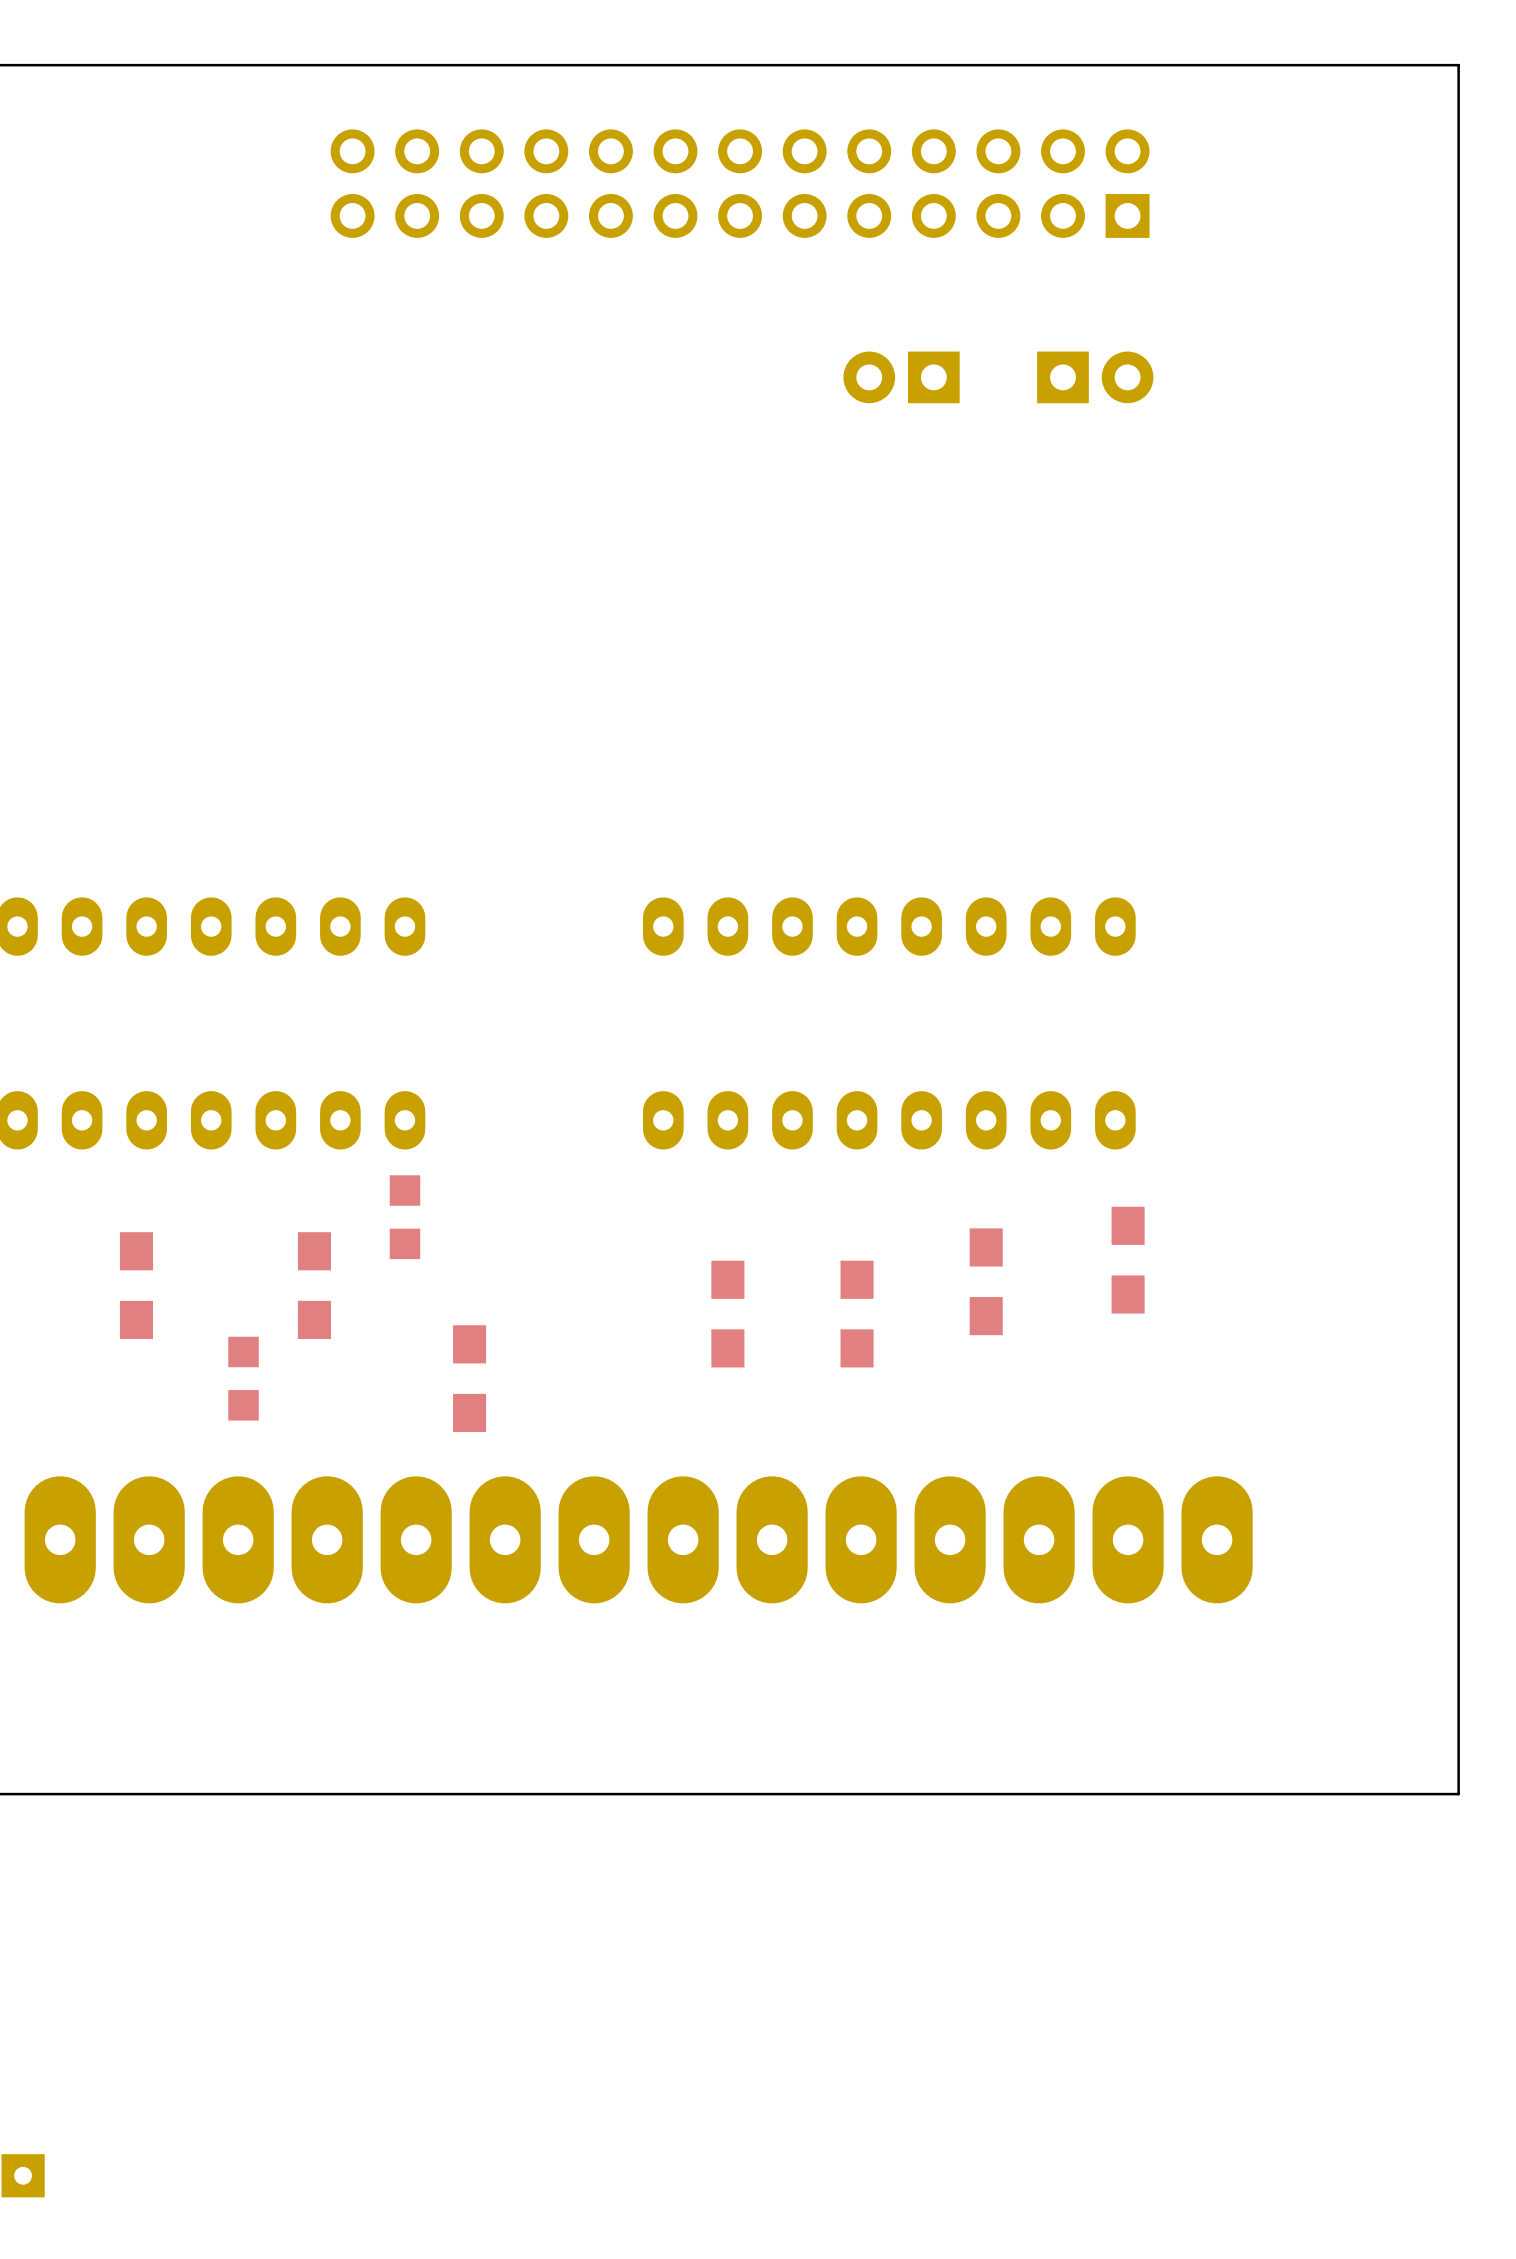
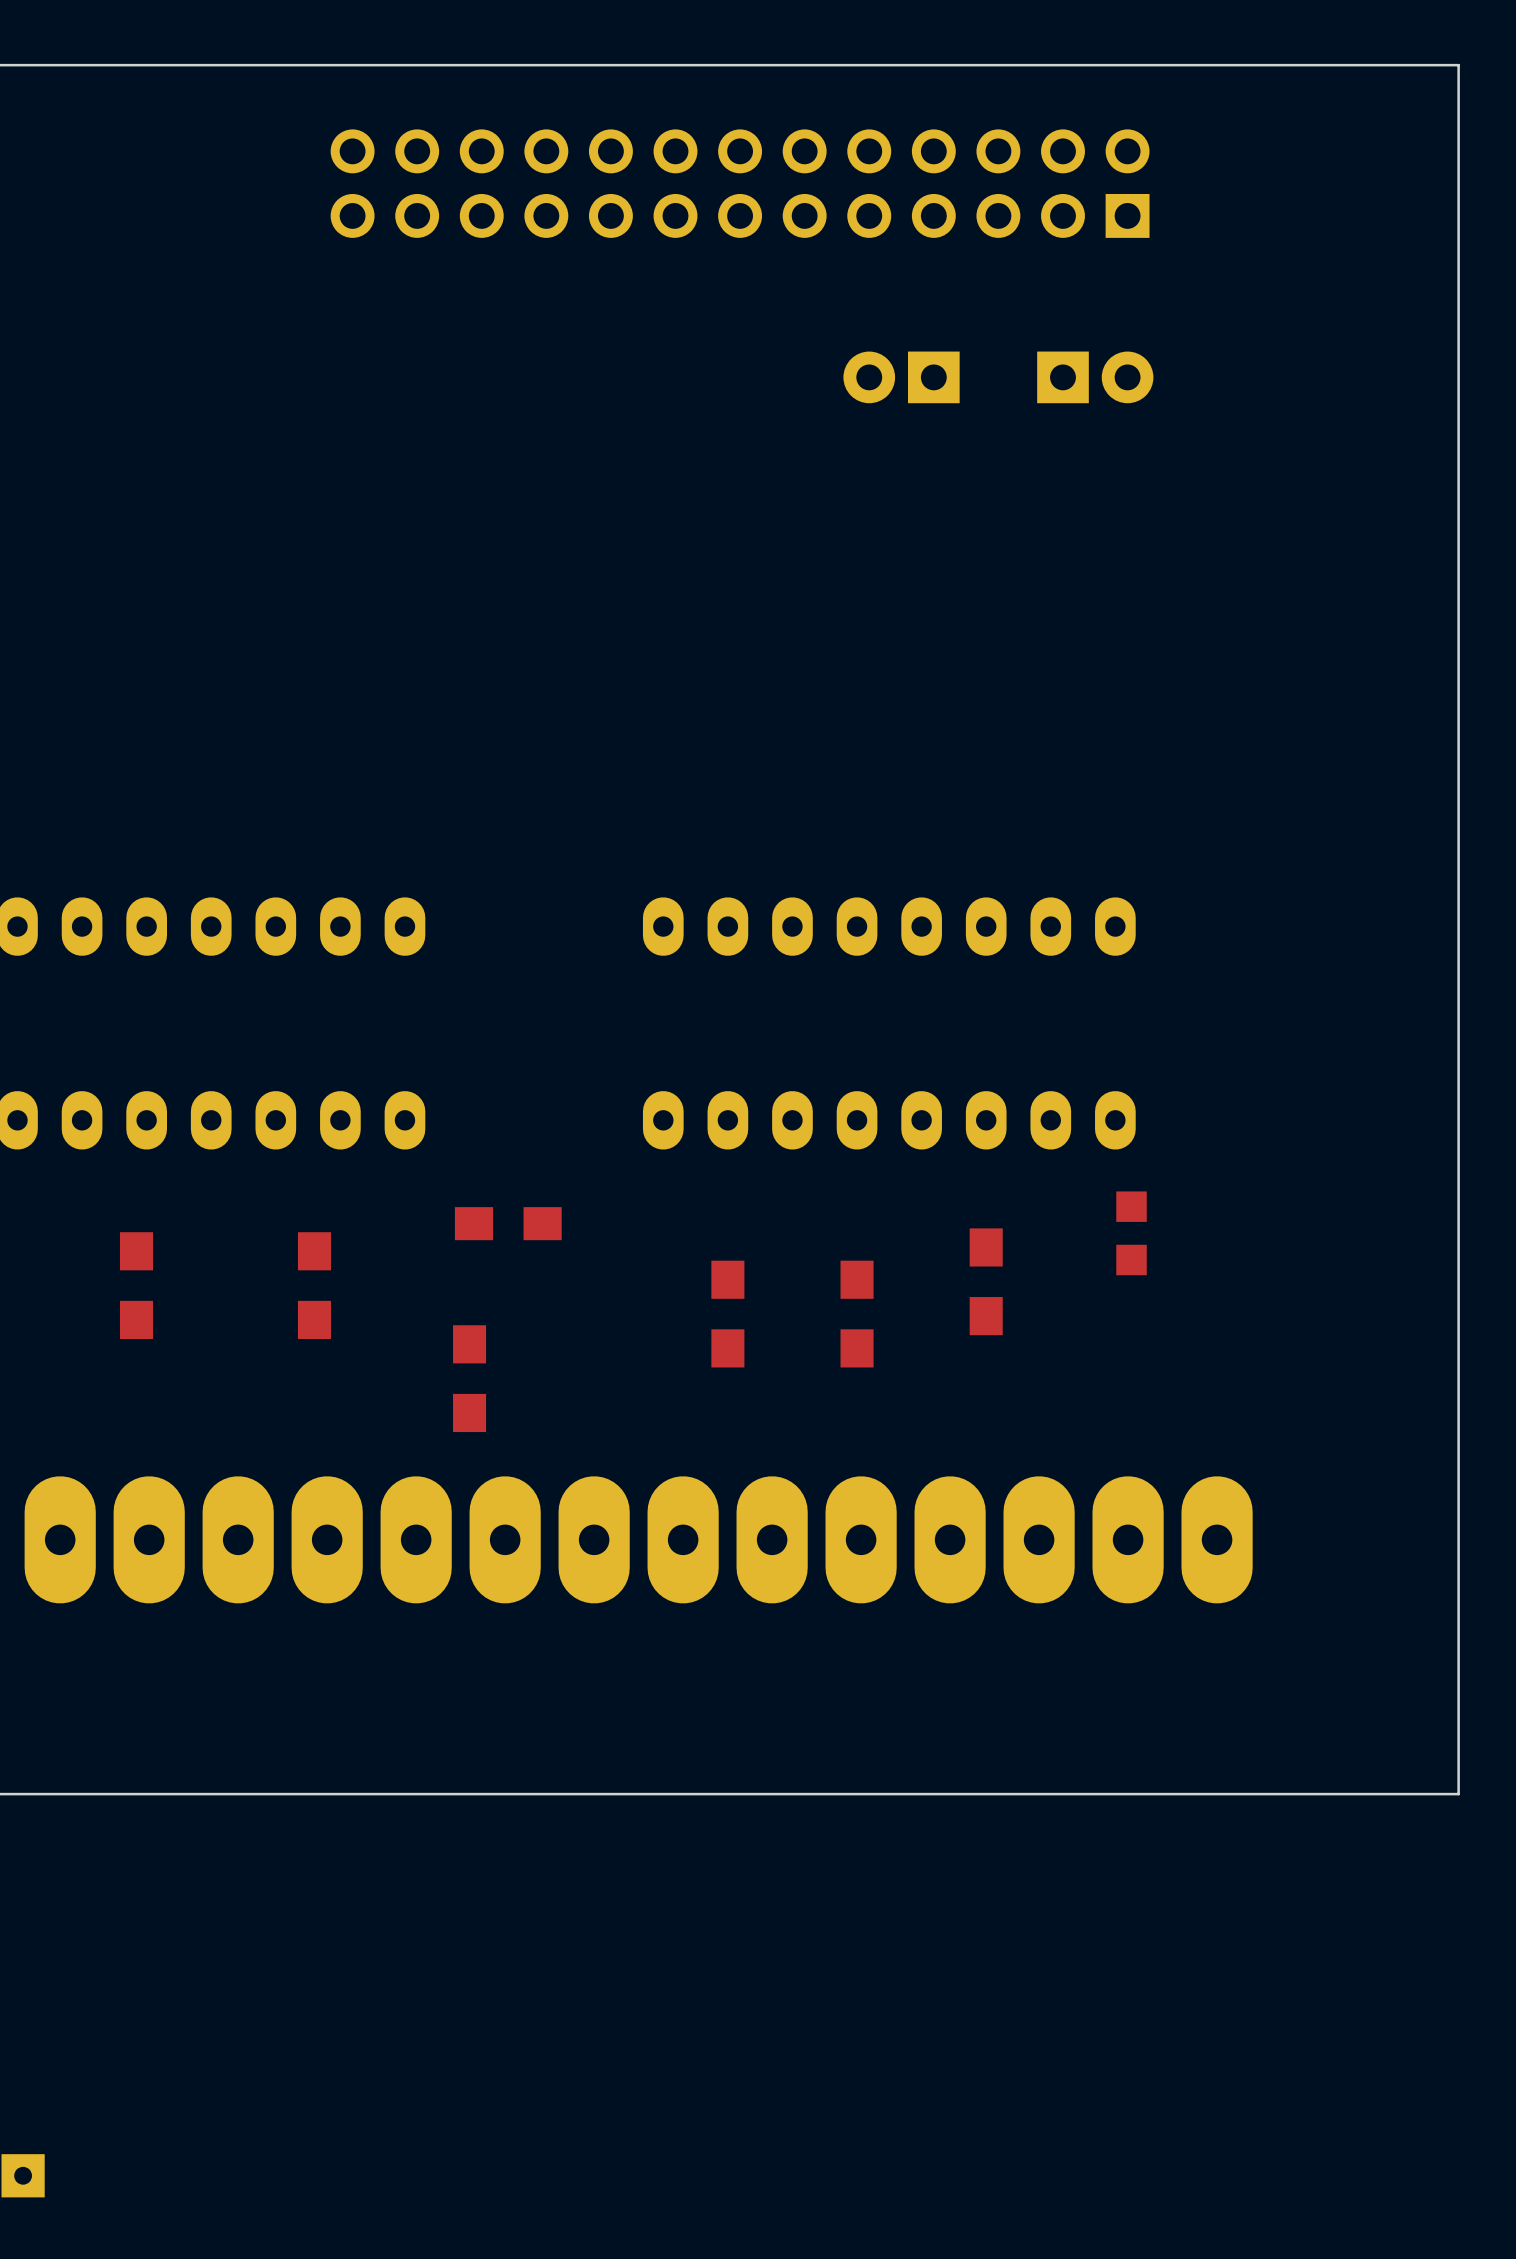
part: (404, 1217) -> none
part: none -> (508, 1223)
part: none -> (1131, 1233)
part: (1128, 1260) -> none
part: (243, 1378) -> none

